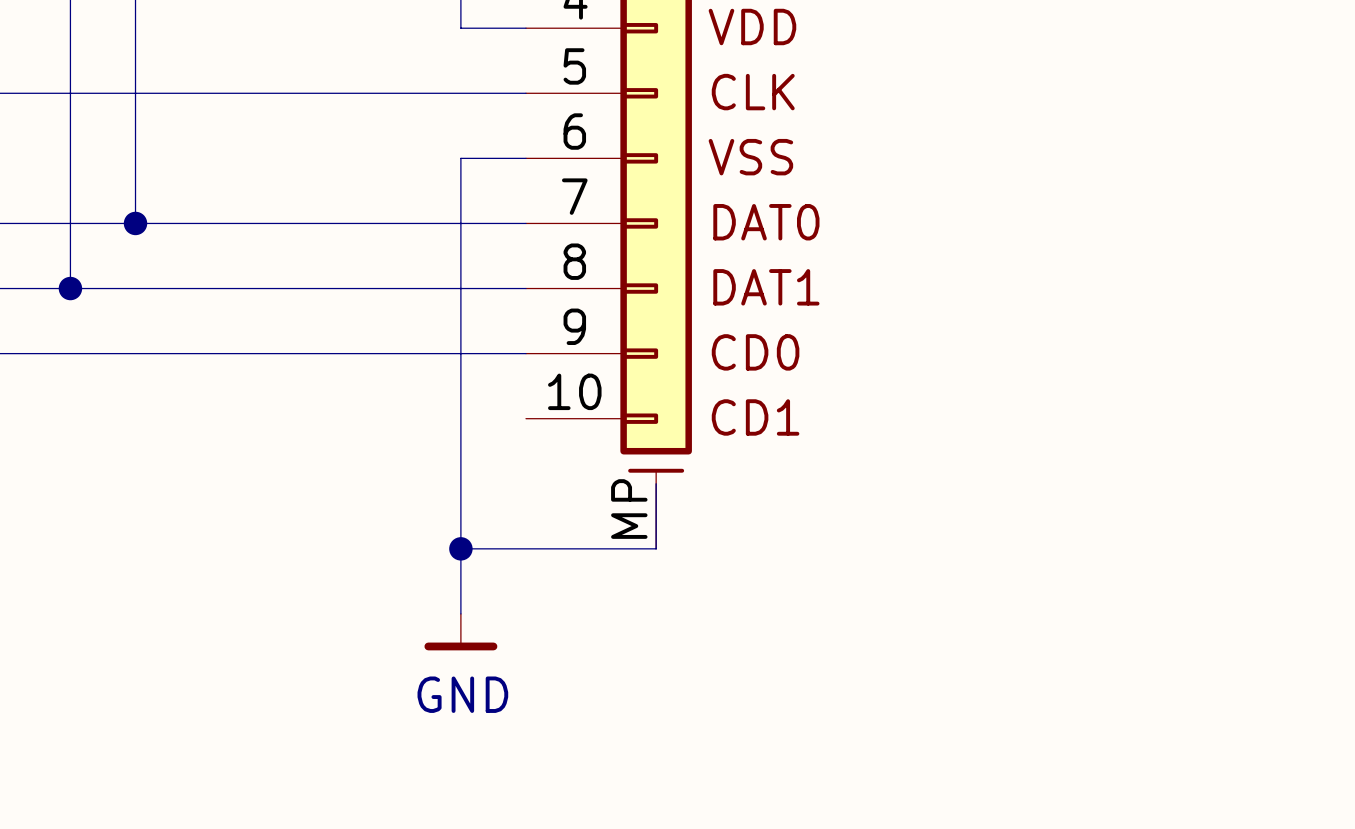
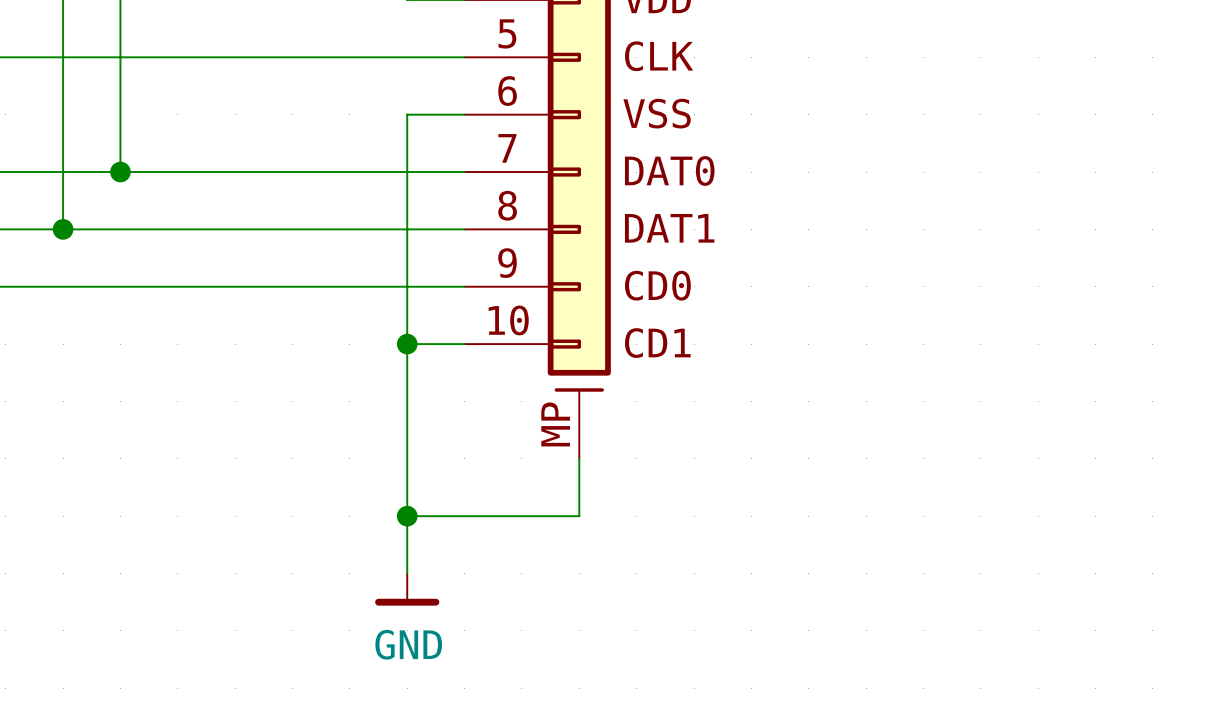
wire: none -> (407, 344) (464, 344)
junction: none -> (407, 344)
wire: (656, 483) (656, 548) (460, 548) -> none
junction: (460, 548) -> none
wire: none -> (579, 458) (579, 516) (407, 516) (407, 573)
junction: none -> (407, 516)
power symbol position: GND (460, 632) -> GND (407, 589)

